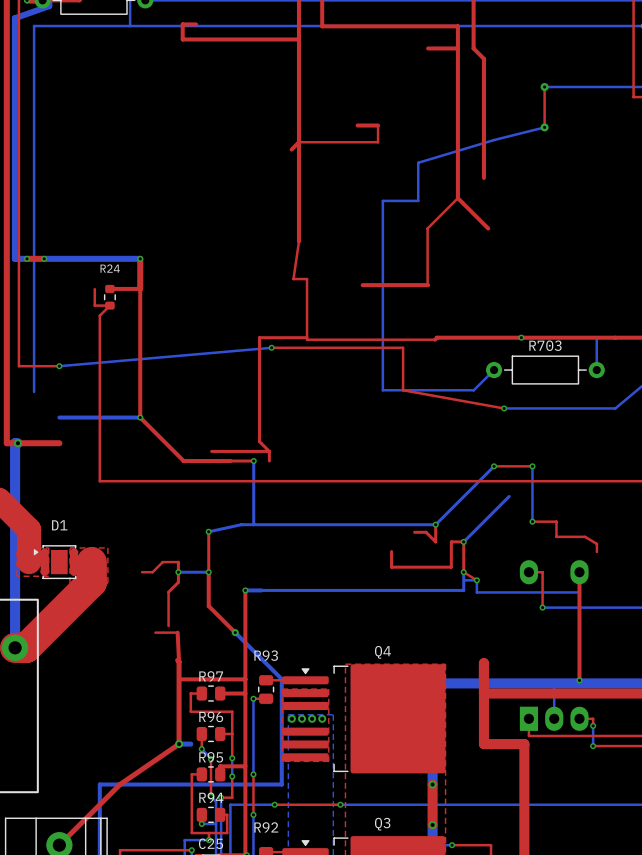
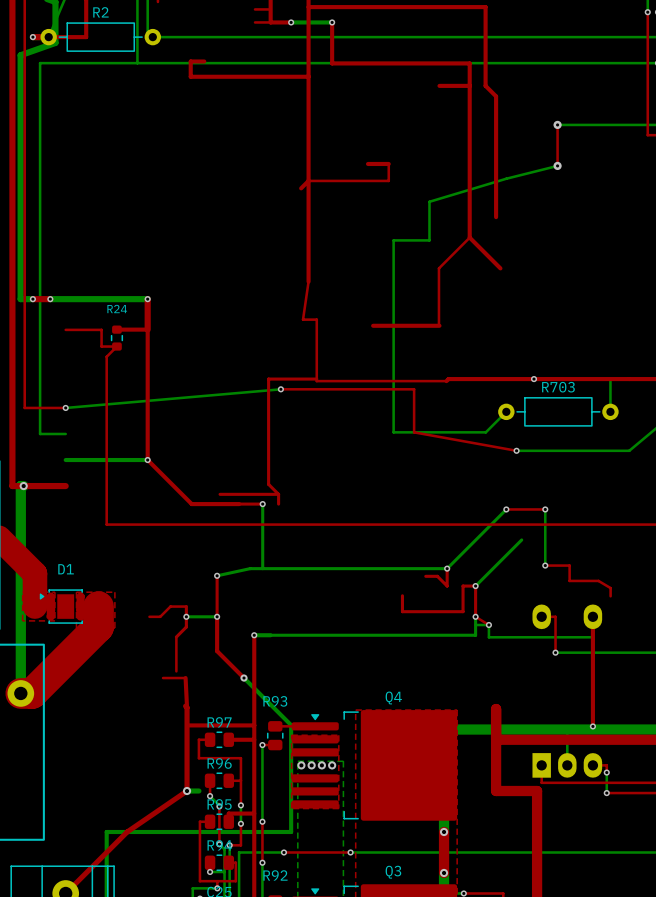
top track: none -> (65, 329) (101, 329)
bottom track: none -> (40, 433) (65, 433)

